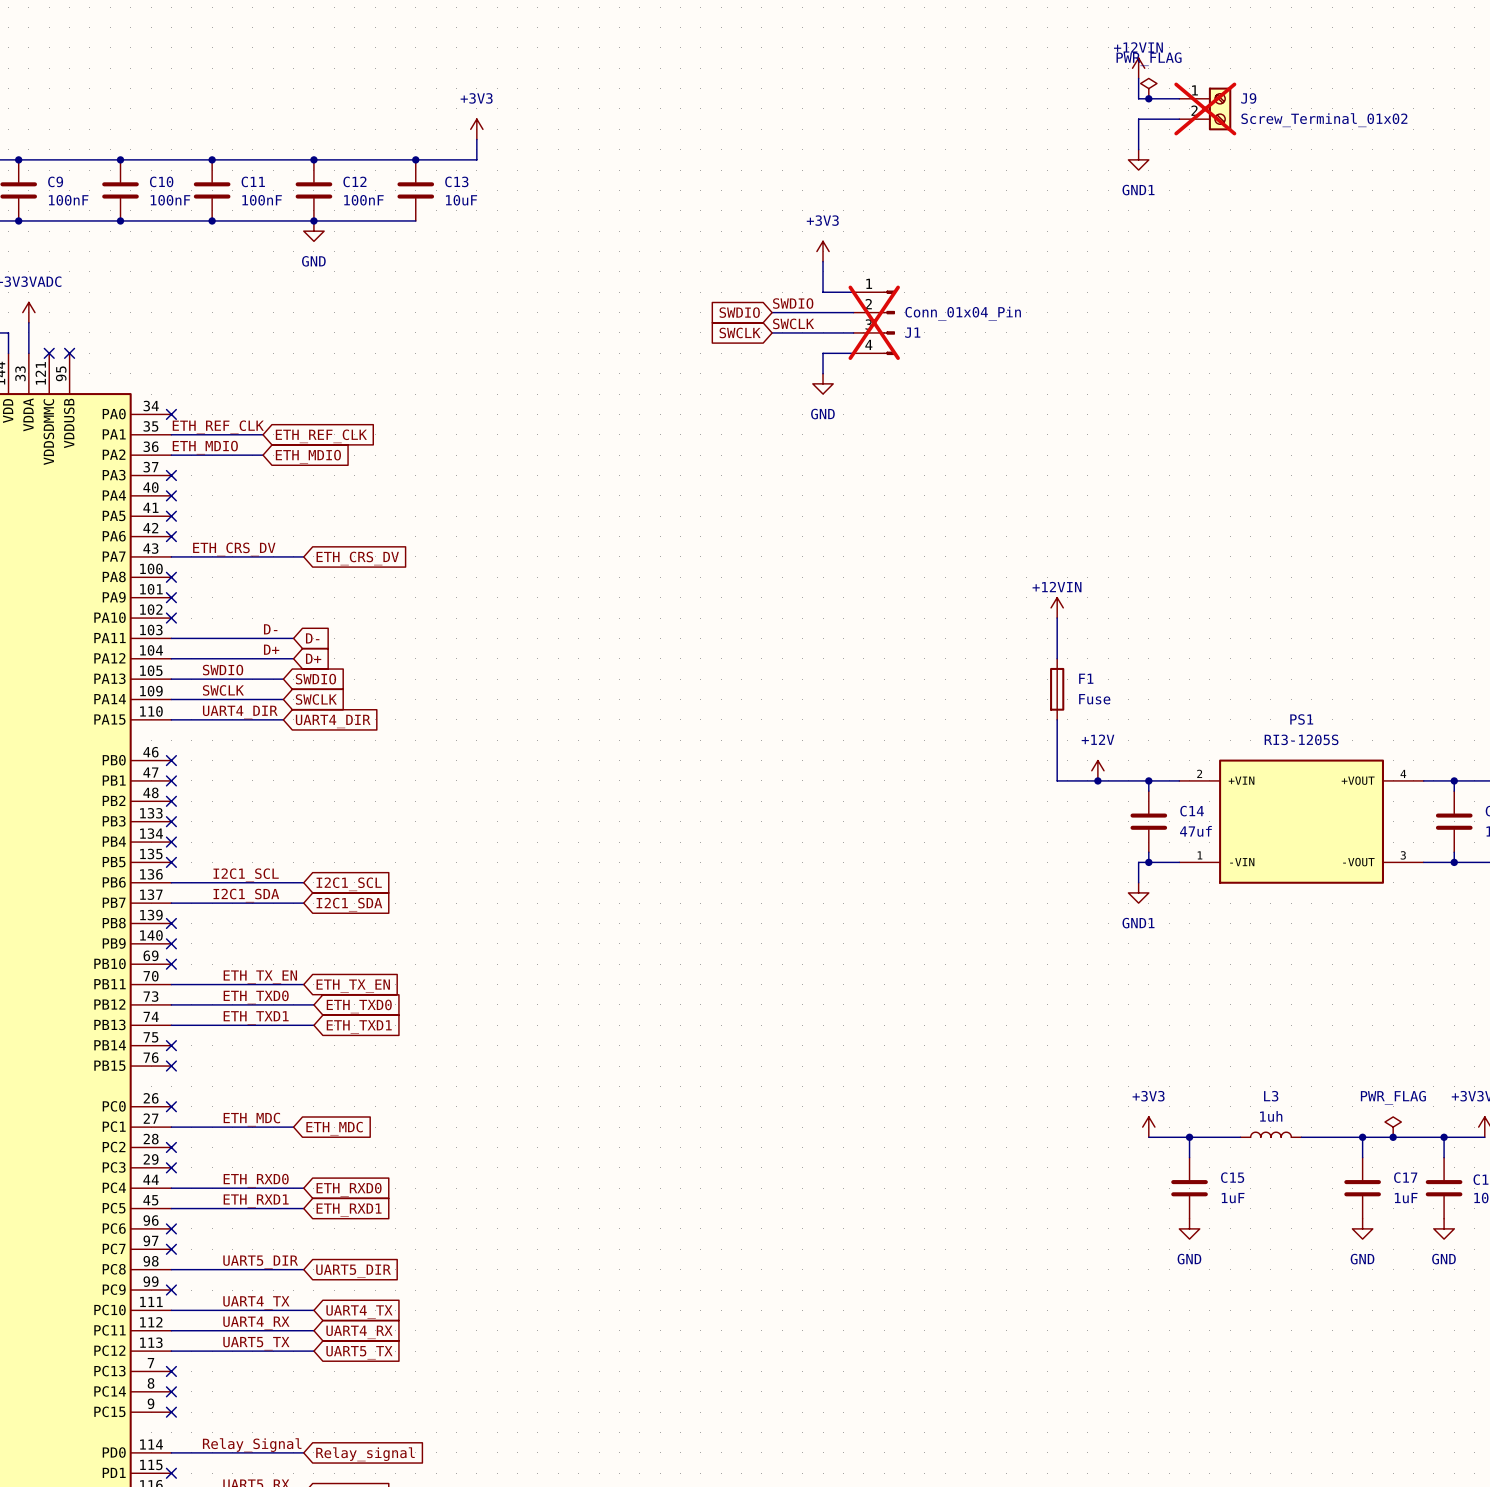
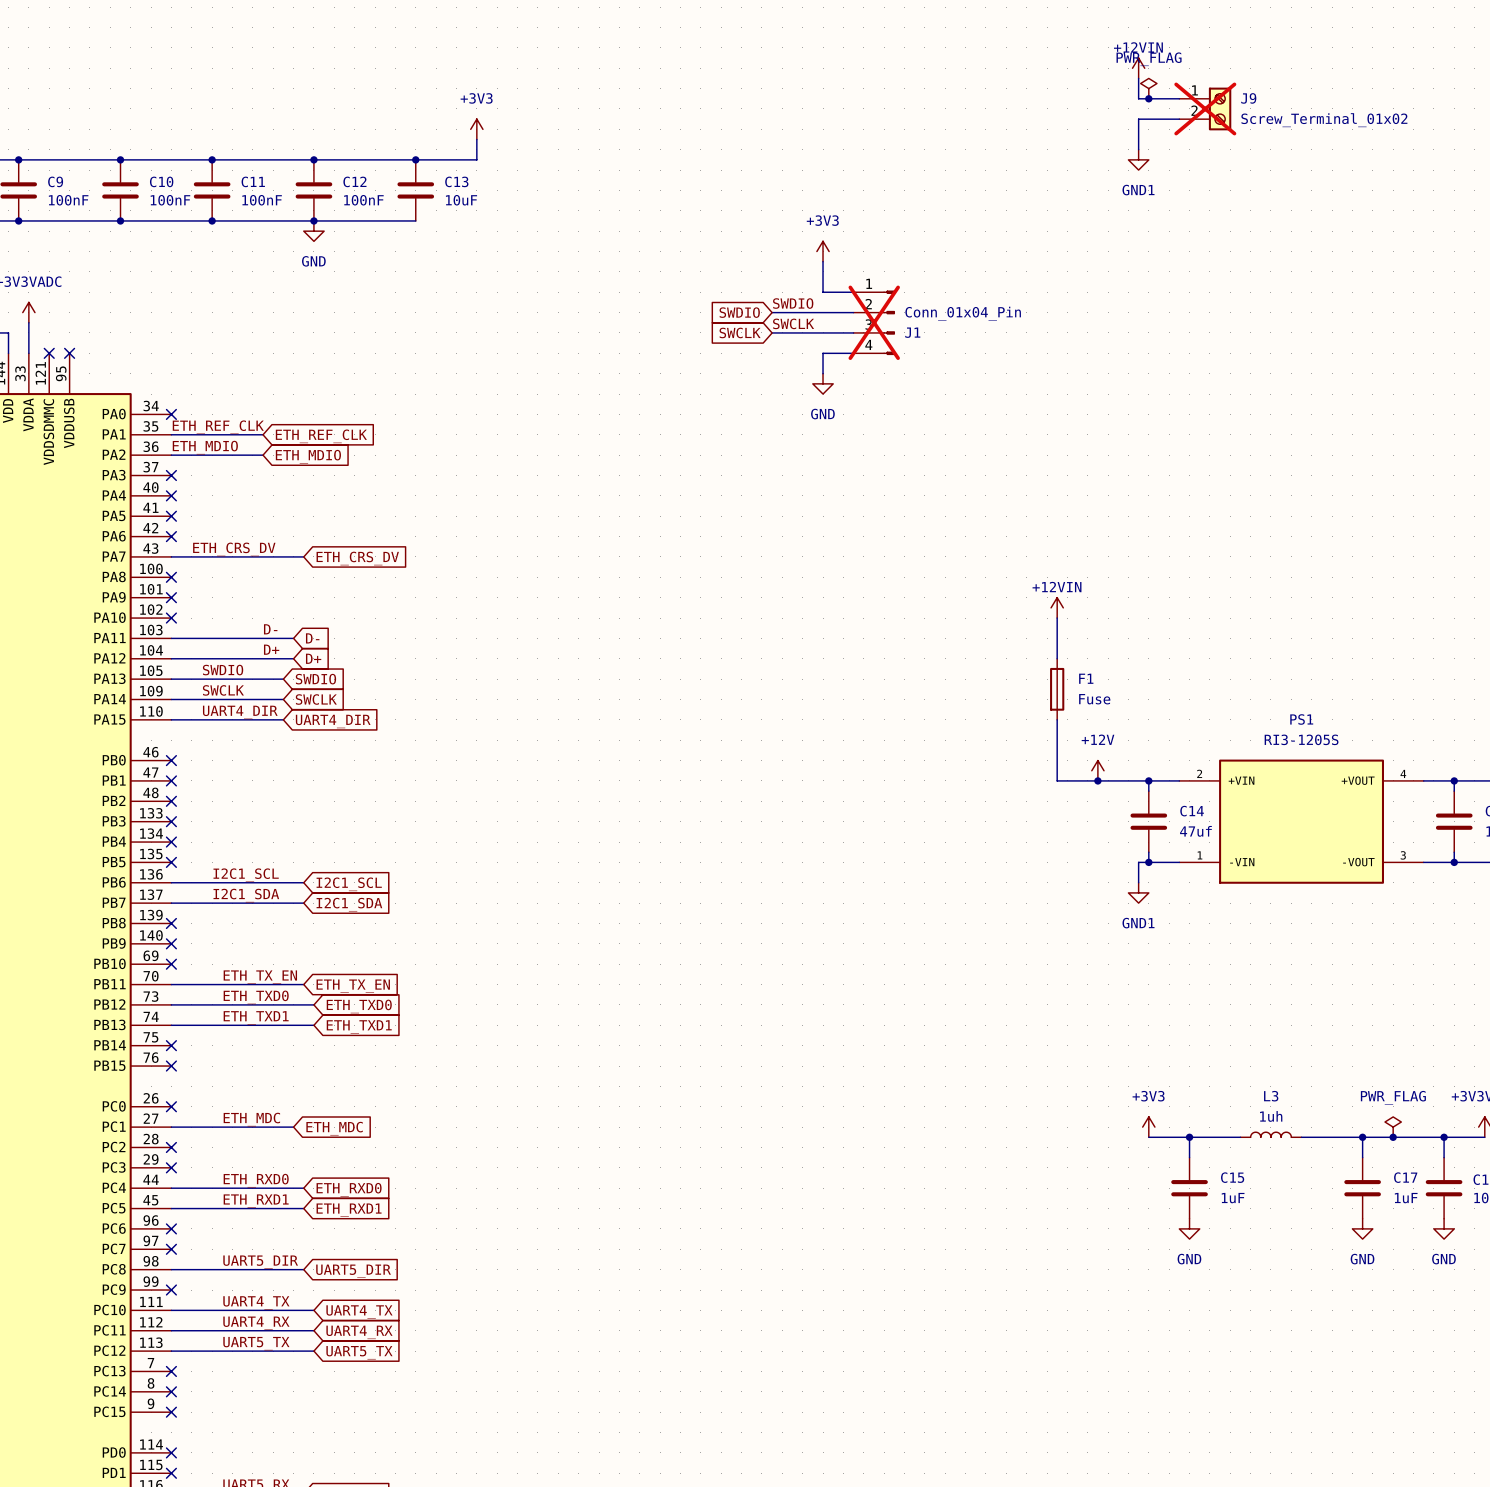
label: Relay_Signal (252, 1445) -> none
wire: (171, 1452) (303, 1452) -> none
no-connect mark: none -> (171, 1452)
global label: Relay_signal (365, 1454) -> none

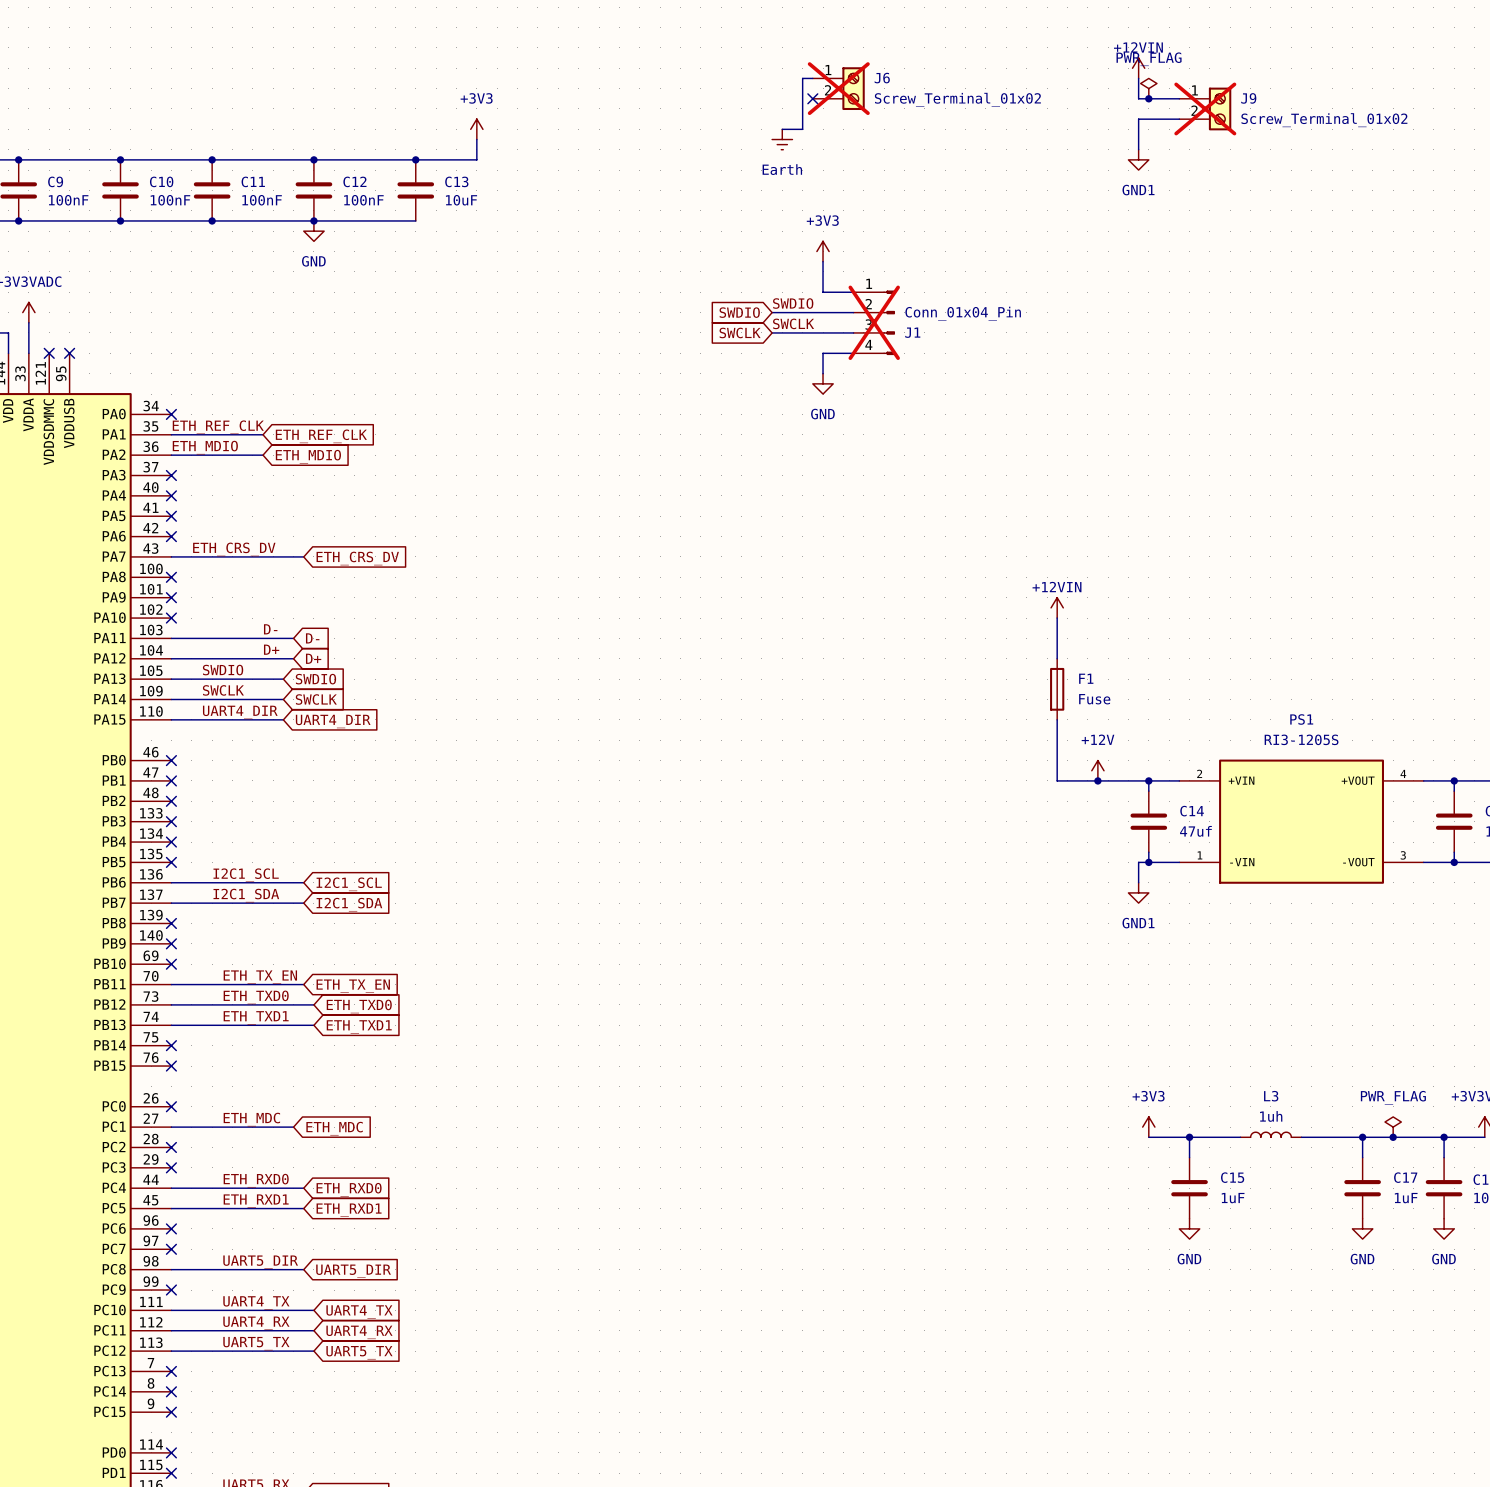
wire: none -> (812, 78) (802, 78) (802, 129) (782, 129)
J6: none -> Screw_Terminal_01x02 (838, 88)
no-connect mark: none -> (812, 98)
power symbol: none -> Earth (782, 139)

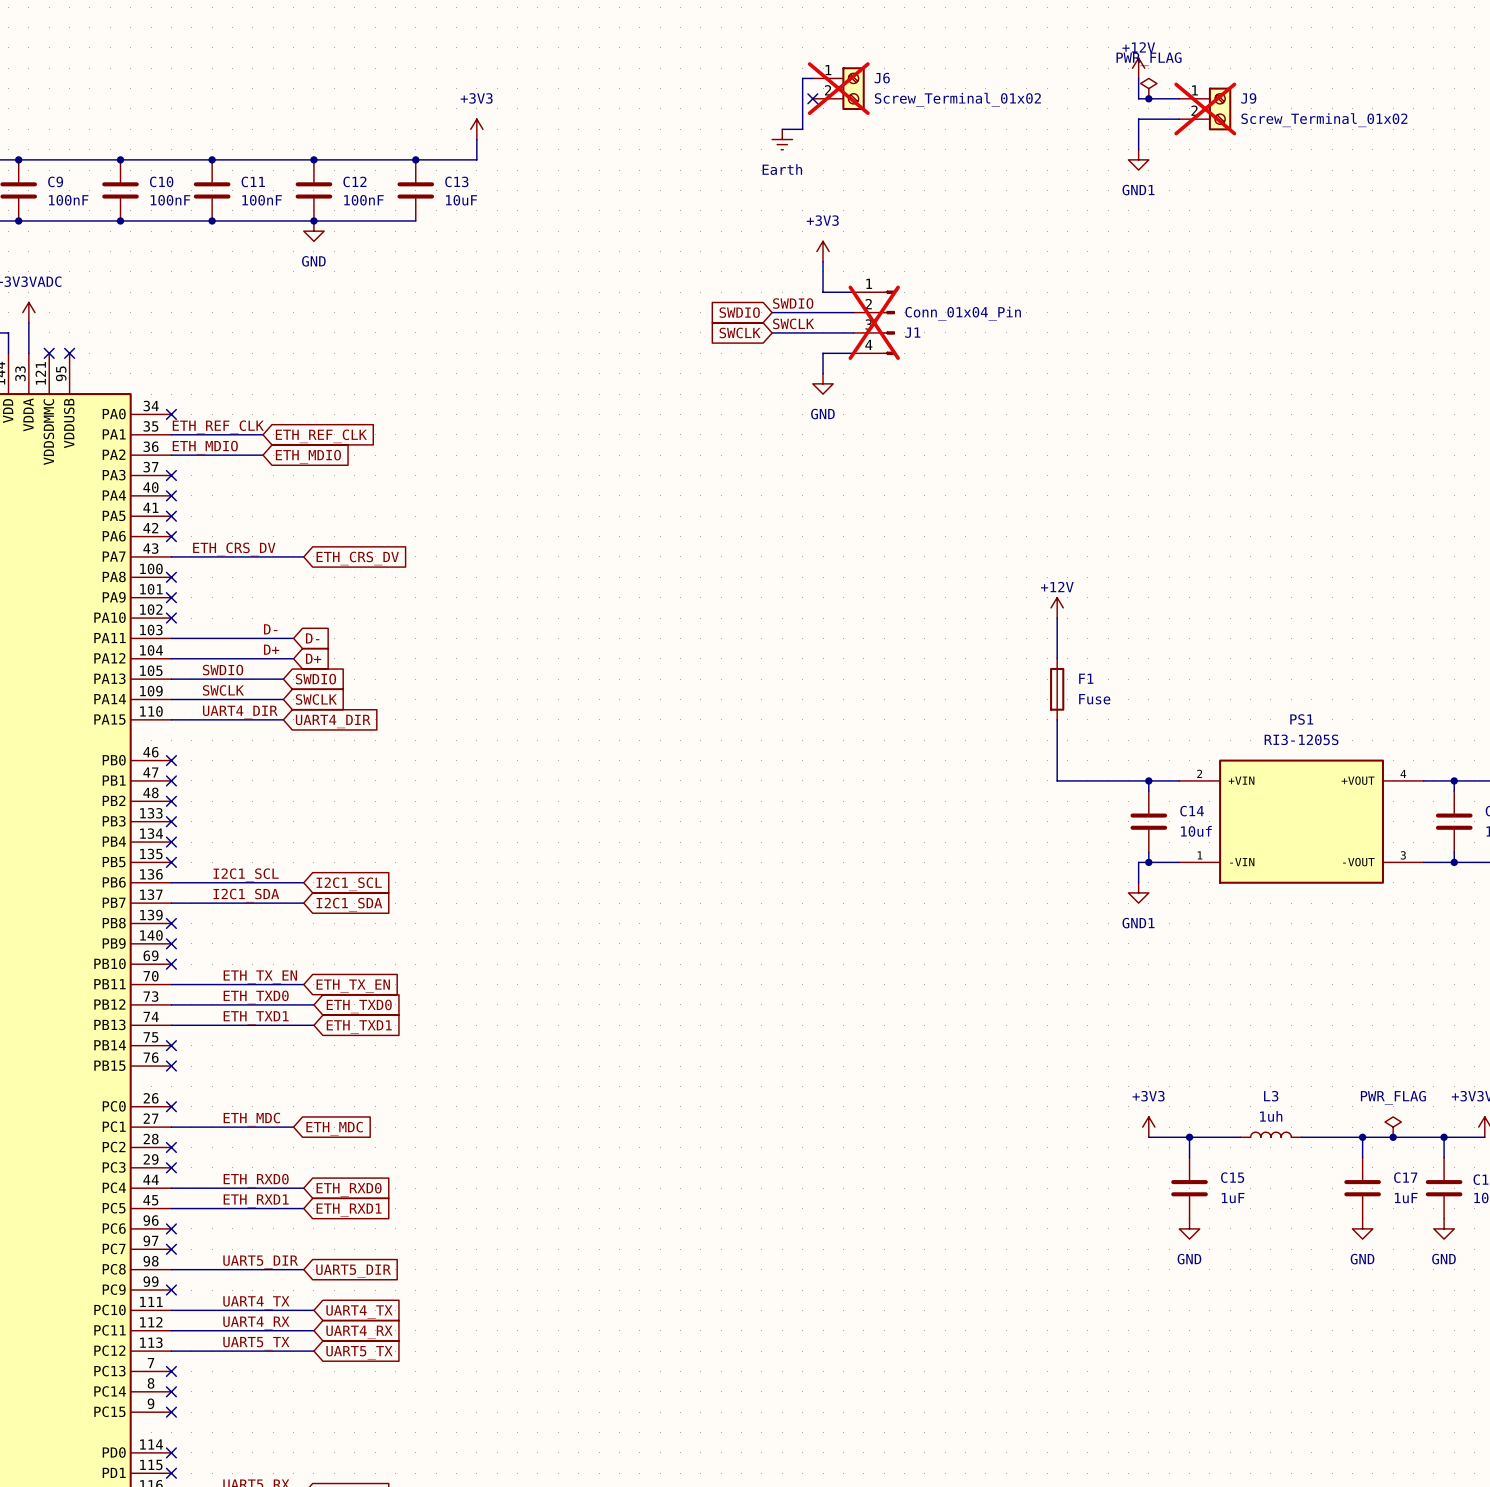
power symbol: +12VIN (1138, 68) -> +12V (1138, 68)
power symbol: +12VIN (1057, 607) -> +12V (1057, 607)
power symbol: +12V (1097, 770) -> none
junction: (1097, 780) -> none
C14 value: 47uf (1195, 831) -> 10uf (1196, 831)

